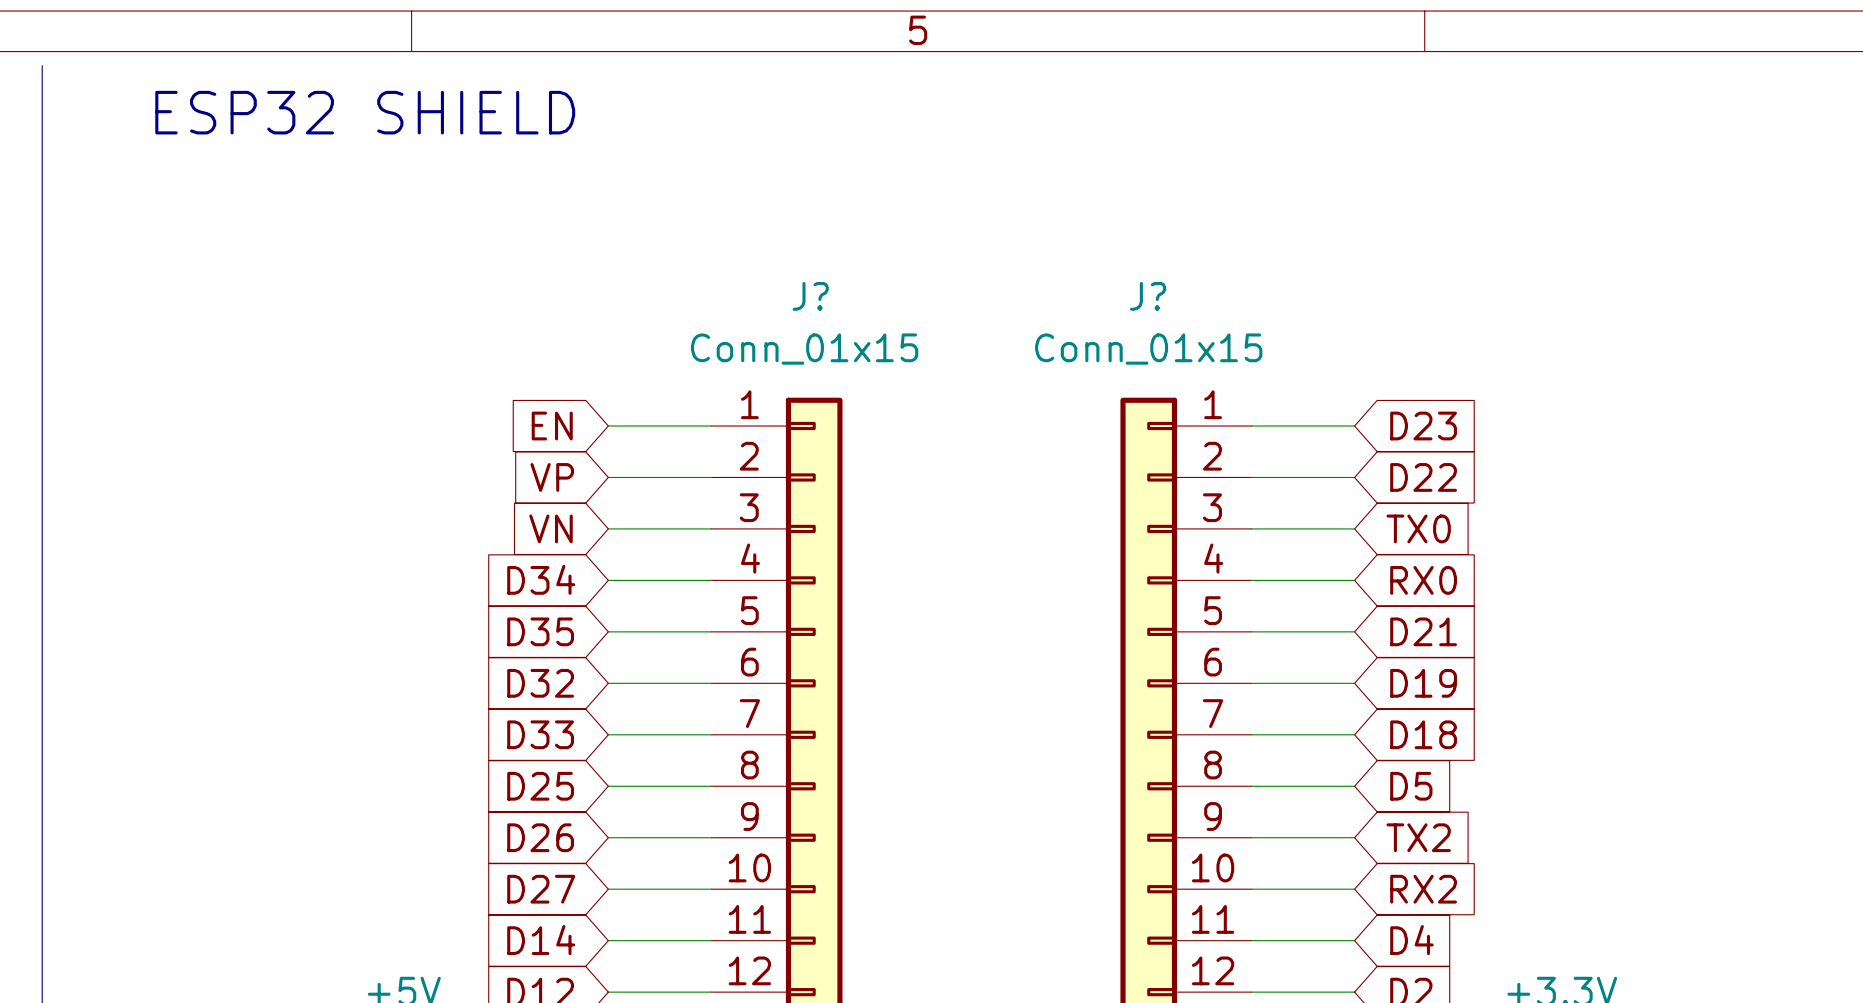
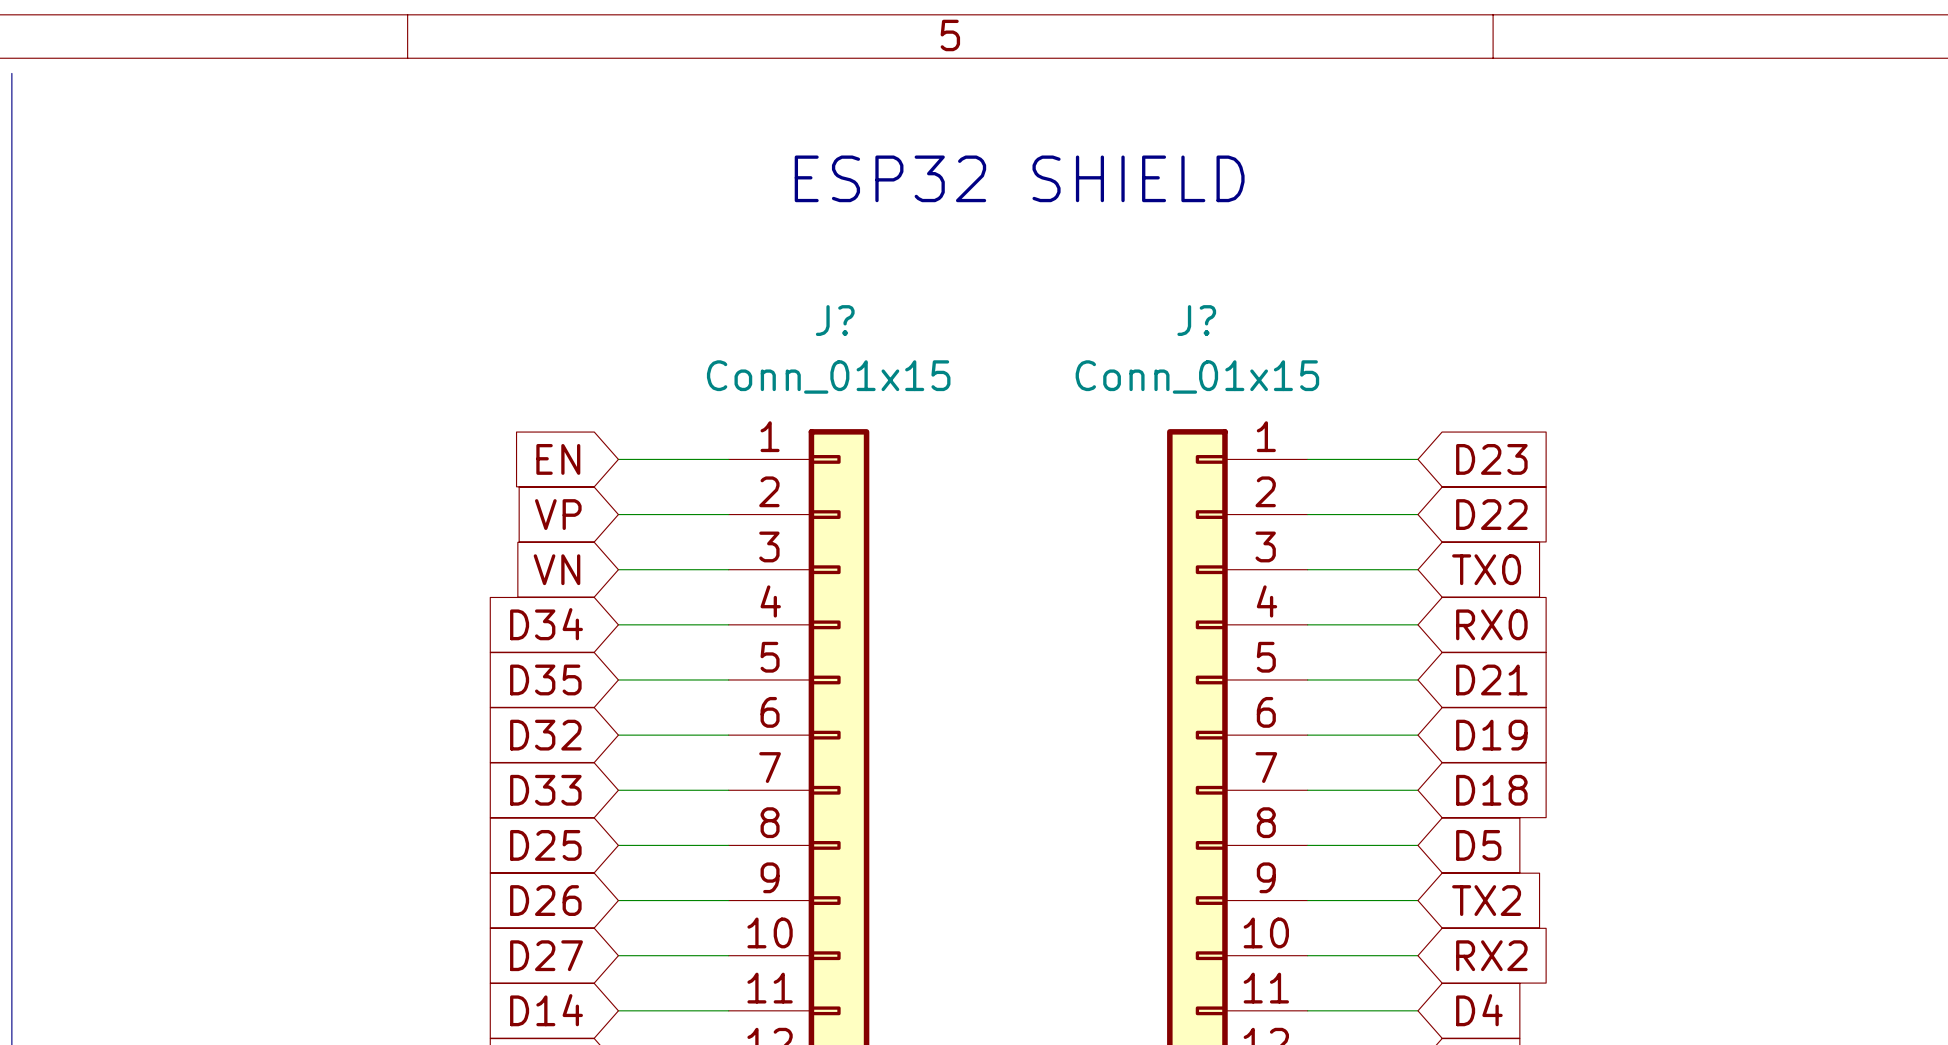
text: ESP32 SHIELD (365, 112) -> none
text: none -> ESP32 SHIELD (1019, 178)

